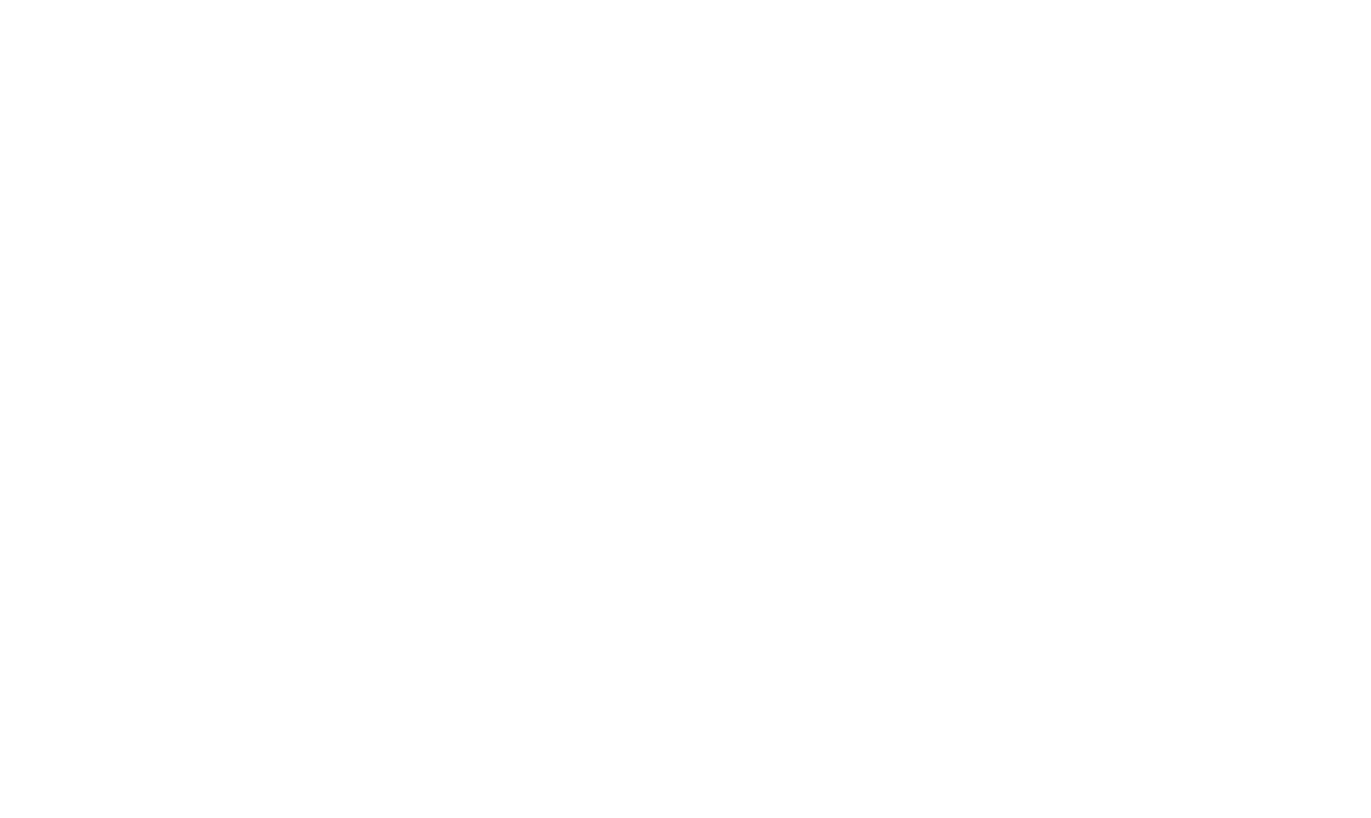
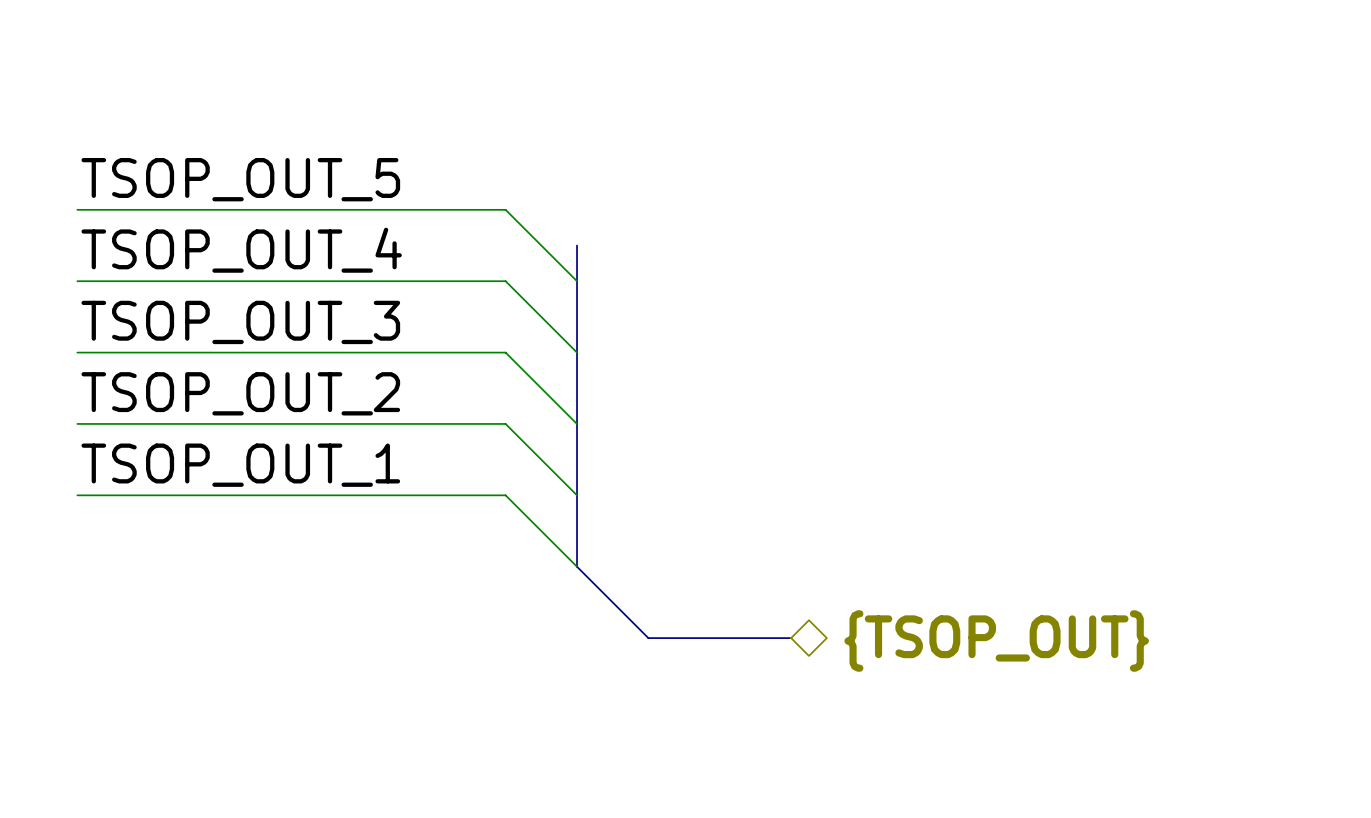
label: none -> TSOP_OUT_5 (240, 179)
wire: none -> (77, 209) (505, 209) (577, 281)
bus: none -> (577, 245) (577, 566) (648, 638) (791, 638)
label: none -> TSOP_OUT_4 (241, 250)
wire: none -> (77, 281) (505, 281) (577, 352)
label: none -> TSOP_OUT_3 (240, 322)
wire: none -> (77, 352) (505, 352) (577, 423)
label: none -> TSOP_OUT_2 (240, 393)
wire: none -> (77, 423) (505, 423) (577, 495)
label: none -> TSOP_OUT_1 (240, 465)
wire: none -> (77, 495) (505, 495) (577, 566)
hierarchical label: none -> {TSOP_OUT} (996, 641)

